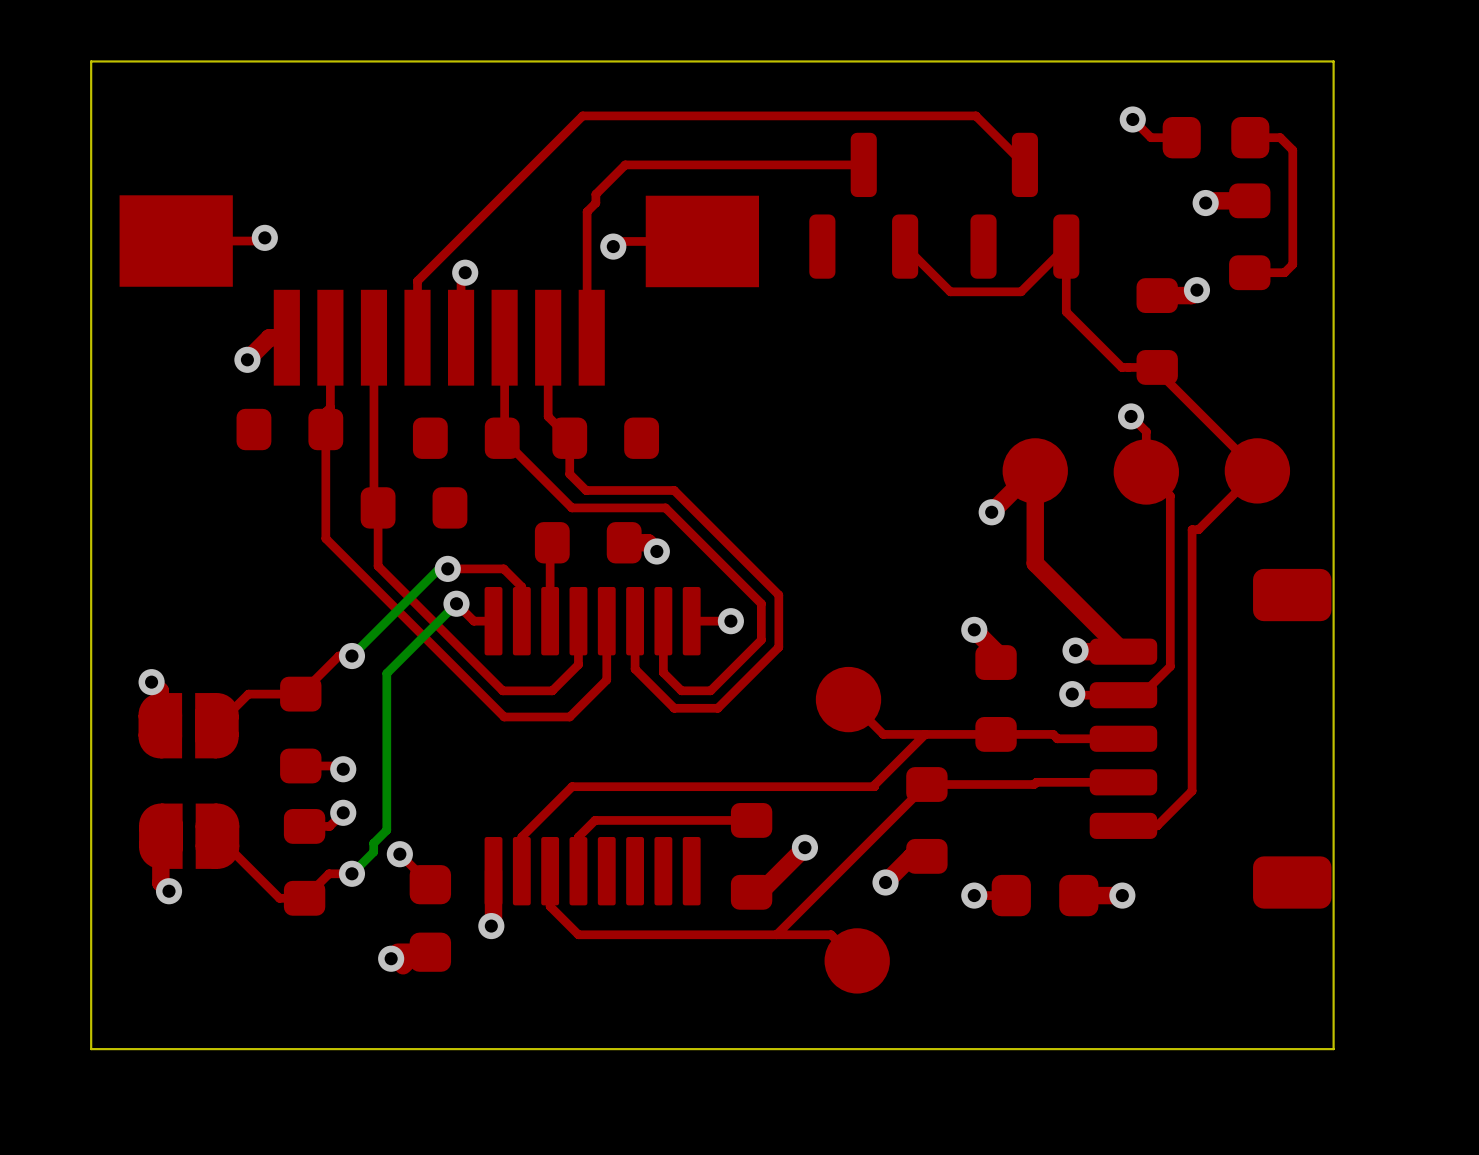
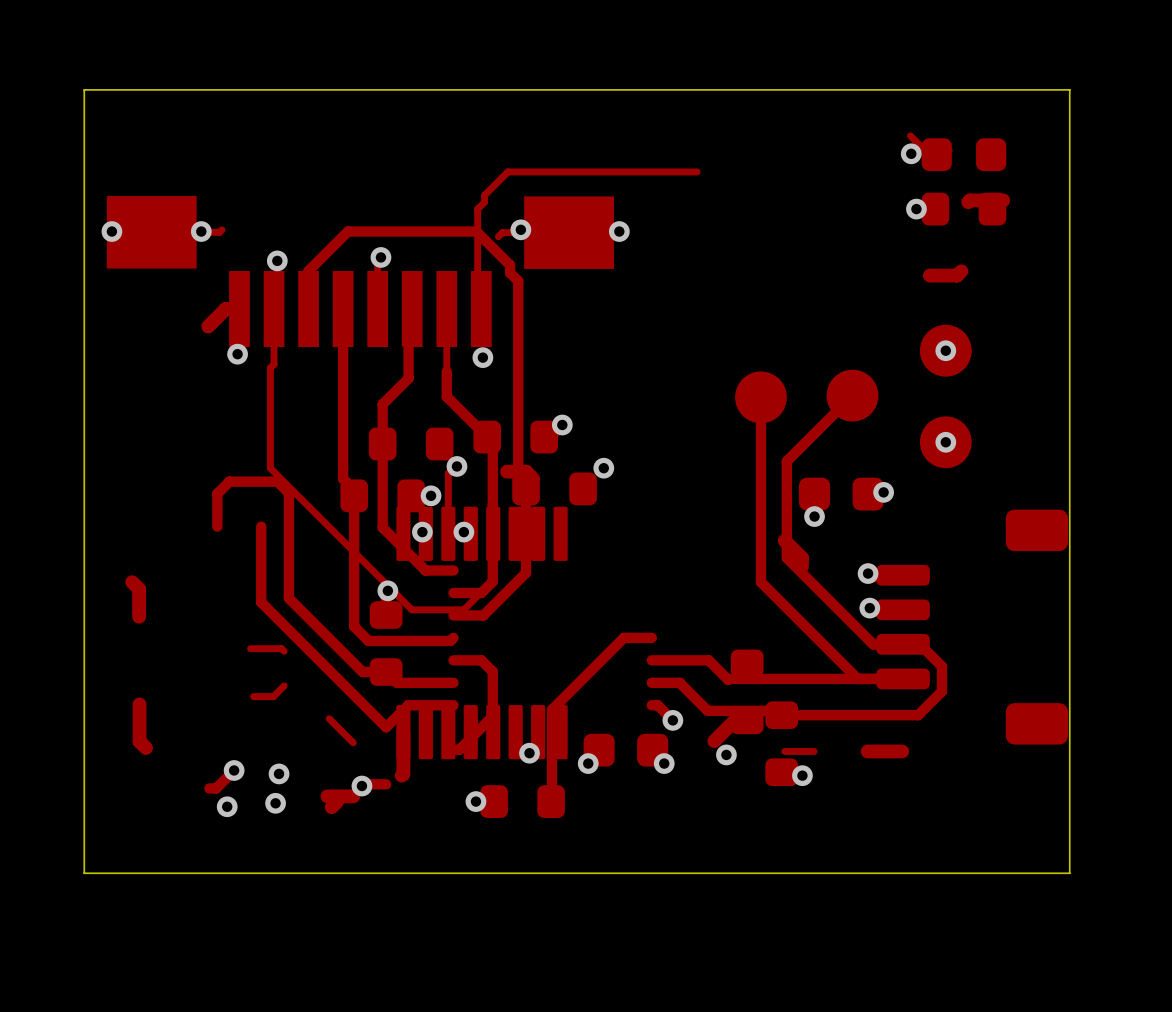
via position: (1132, 119) -> (911, 153)
part position: (1216, 137) -> (963, 154)
top track: (1250, 137) (1280, 137) (1292, 150) (1292, 264) (1284, 272) (1249, 272) -> none
top track: (1024, 164) (975, 115) (582, 115) (417, 281) (417, 337) -> (453, 637) (450, 640) (368, 640) (354, 626) (354, 489) (343, 478) (343, 309)
via: (1205, 203) -> none
part: (863, 205) -> none
part: (1024, 205) -> none
via: none -> (916, 209)
part rotation: 0° (1249, 236) -> 90° clockwise (963, 209)
via position: (264, 237) -> (201, 231)
via: none -> (111, 231)
via: none -> (619, 231)
via position: (613, 246) -> (520, 229)
top track: (905, 246) (950, 291) (1021, 291) (1066, 246) (1066, 311) (1121, 367) (1157, 367) (1157, 370) (1257, 470) (1198, 529) (1192, 529) (1192, 790) (1157, 825) (1123, 825) -> none
via: none -> (277, 260)
via: (1196, 290) -> none
part: (1157, 331) -> none
top track: (373, 337) (373, 492) (378, 496) (378, 566) (502, 690) (552, 690) (578, 664) (578, 621) -> (308, 309) (308, 270) (347, 231) (476, 231) (510, 265) (510, 272) (518, 281) (518, 481) (526, 488) (526, 572) (483, 615) (453, 615)
top track: (504, 337) (504, 420) (502, 422) (502, 438) (571, 507) (665, 507) (761, 603) (761, 640) (710, 690) (681, 690) (663, 672) (663, 621) -> none
top track: none -> (408, 312) (408, 378) (382, 404) (382, 527) (425, 570) (453, 570)
via position: (247, 359) -> (237, 354)
part: none -> (945, 350)
via: none -> (945, 350)
via: none -> (482, 357)
top track: (548, 416) (569, 438) (569, 474) (586, 490) (674, 490) (778, 595) (778, 647) (717, 708) (674, 708) (635, 669) (635, 621) -> (446, 371) (446, 396) (492, 442) (492, 581) (481, 592) (453, 592)
top track: (1131, 416) (1146, 431) (1146, 471) (1170, 495) (1170, 666) (1141, 695) (1072, 694) -> none
via: (1131, 416) -> none
part: (289, 429) -> none
part: (466, 438) -> none
part: (605, 438) -> none
top track: none -> (852, 395) (786, 461) (786, 557) (873, 644) (919, 644) (941, 666) (941, 691) (918, 715) (781, 715) (777, 710) (707, 710) (679, 682) (651, 682)
top track: none -> (760, 397) (760, 582) (857, 678)
part: none -> (760, 397)
part position: (1035, 470) -> (852, 395)
part: (1257, 470) -> none
part: (1146, 471) -> none
via: none -> (562, 425)
part: none -> (515, 437)
part: none -> (945, 442)
via: none -> (945, 442)
part: (414, 507) -> none
part: none -> (411, 444)
top track: (991, 512) (1035, 470) (1035, 563) (1123, 651) (1075, 650) -> none
via: (991, 512) -> none
via: none -> (456, 466)
via: none -> (603, 468)
part: (588, 542) -> none
via: (656, 551) -> none
part: none -> (554, 488)
top track: (447, 568) (503, 568) (521, 586) (521, 621) -> none
bottom track: (447, 568) (439, 568) (351, 656) -> none
via: (447, 568) -> none
part footprint: [1089, 568, 1332, 909] -> [876, 509, 1069, 745]
via: none -> (883, 492)
part: none -> (841, 494)
part: none -> (382, 495)
via: none -> (431, 495)
via: none -> (814, 516)
top track: (456, 603) (473, 621) (493, 621) -> none
bottom track: (456, 603) (386, 673) (386, 830) (373, 843) (373, 852) (351, 873) -> none
via: (456, 603) -> none
top track: none -> (217, 526) (217, 493) (229, 481) (277, 481) (288, 493) (288, 598) (362, 672) (386, 672) (396, 682) (453, 682)
top track: none -> (261, 526) (261, 602) (386, 727) (408, 705) (453, 705)
via: none -> (422, 532)
via: none -> (463, 532)
top track: (730, 621) (691, 621) -> none
via: (730, 621) -> none
via: (974, 629) -> none
via: (1075, 650) -> none
top track: (351, 656) (338, 656) (300, 694) (248, 694) (216, 725) -> none
via: (351, 656) -> none
via: none -> (868, 573)
via: (151, 682) -> none
via: none -> (387, 590)
via: (1072, 694) -> none
part: (996, 698) -> none
top track: (848, 699) (883, 734) (1053, 734) (1057, 738) -> none
part: (848, 699) -> none
via: none -> (869, 608)
part: (188, 725) -> none
part: (300, 730) -> none
top track: (925, 734) (874, 786) (572, 786) (521, 836) (521, 871) -> none
top track: (1123, 738) (1057, 738) -> none
top track: none -> (651, 637) (623, 637) (552, 709) (551, 801)
part: none -> (386, 643)
via: (343, 769) -> none
top track: none -> (453, 660) (481, 660) (492, 671) (492, 716) (459, 749) (454, 749)
top track: none -> (651, 660) (708, 660) (728, 679) (903, 678)
top track: (1123, 782) (926, 784) (776, 934) -> none
via: (343, 812) -> none
top track: (751, 820) (595, 820) (578, 836) (578, 871) -> none
part: (189, 836) -> none
top track: (217, 836) (279, 898) (304, 898) (329, 873) (351, 873) -> none
top track: none -> (651, 705) (657, 705) (672, 720)
top track: (804, 847) (760, 892) (751, 892) -> none
via: (804, 847) -> none
via: (399, 854) -> none
part: (751, 856) -> none
via: none -> (672, 720)
part: (304, 862) -> none
top track: (550, 871) (550, 906) (578, 934) (831, 934) (857, 960) -> none
via: (351, 873) -> none
via position: (885, 882) -> (726, 754)
part: none -> (781, 743)
via: (169, 891) -> none
part: none -> (625, 750)
via: (974, 895) -> none
part: (1045, 895) -> none
via: (1122, 895) -> none
via: none -> (529, 753)
via: none -> (588, 763)
via: none -> (664, 763)
part: (430, 918) -> none
top track: none -> (234, 770) (216, 788) (209, 788)
via: none -> (234, 770)
via: none -> (279, 773)
via: (491, 926) -> none
via: none -> (802, 775)
top track: none -> (386, 784) (363, 784) (361, 786)
via: none -> (361, 786)
via: (391, 958) -> none
via: none -> (475, 801)
part: none -> (522, 801)
via: none -> (275, 803)
part: (857, 960) -> none
via: none -> (227, 806)

